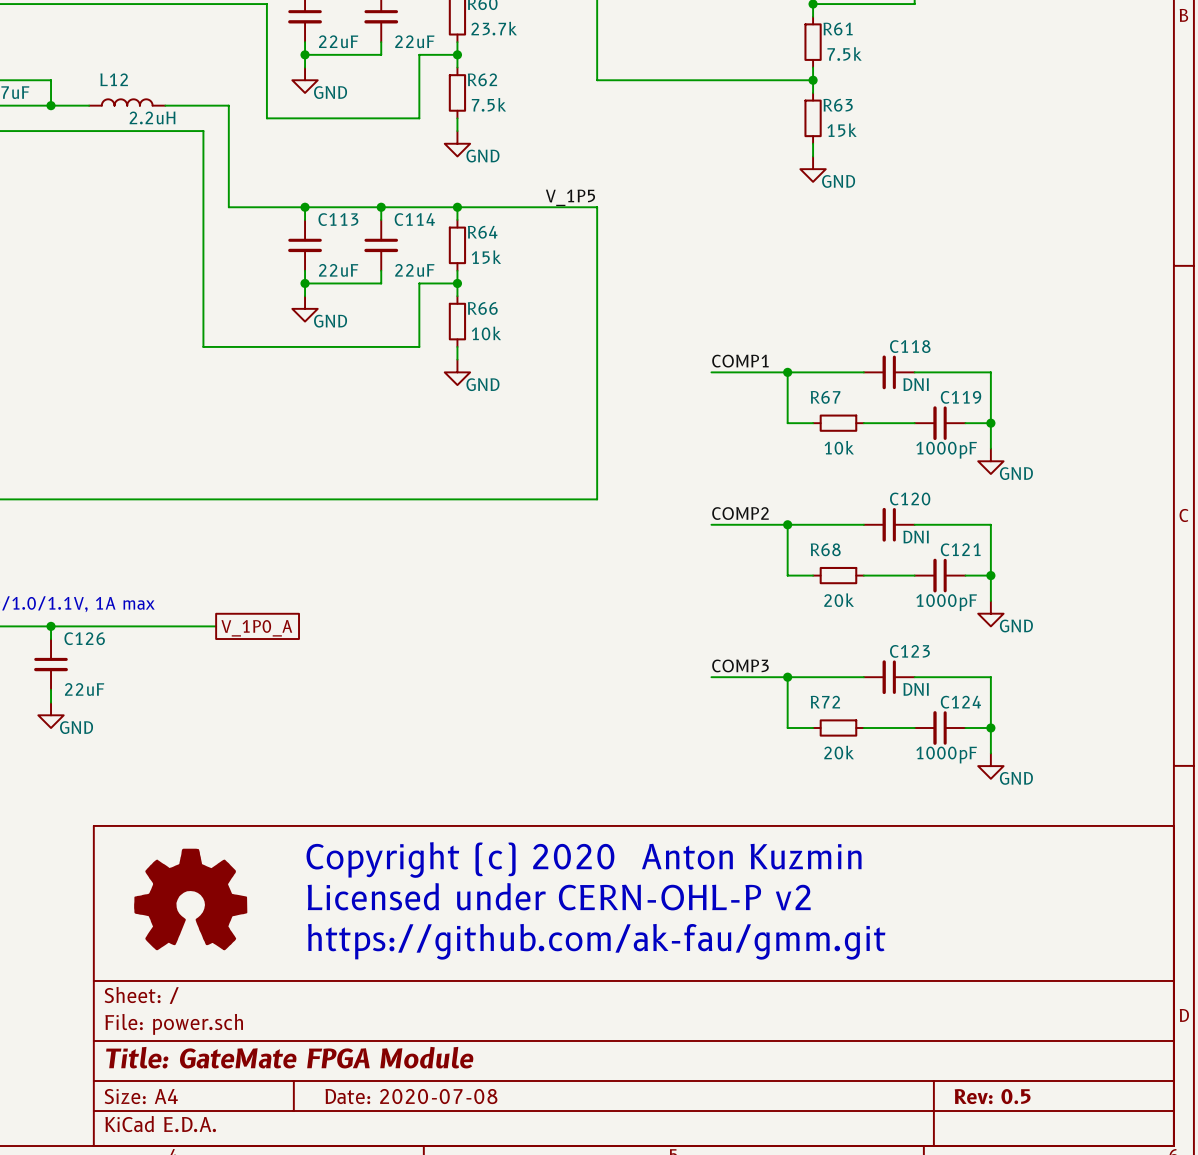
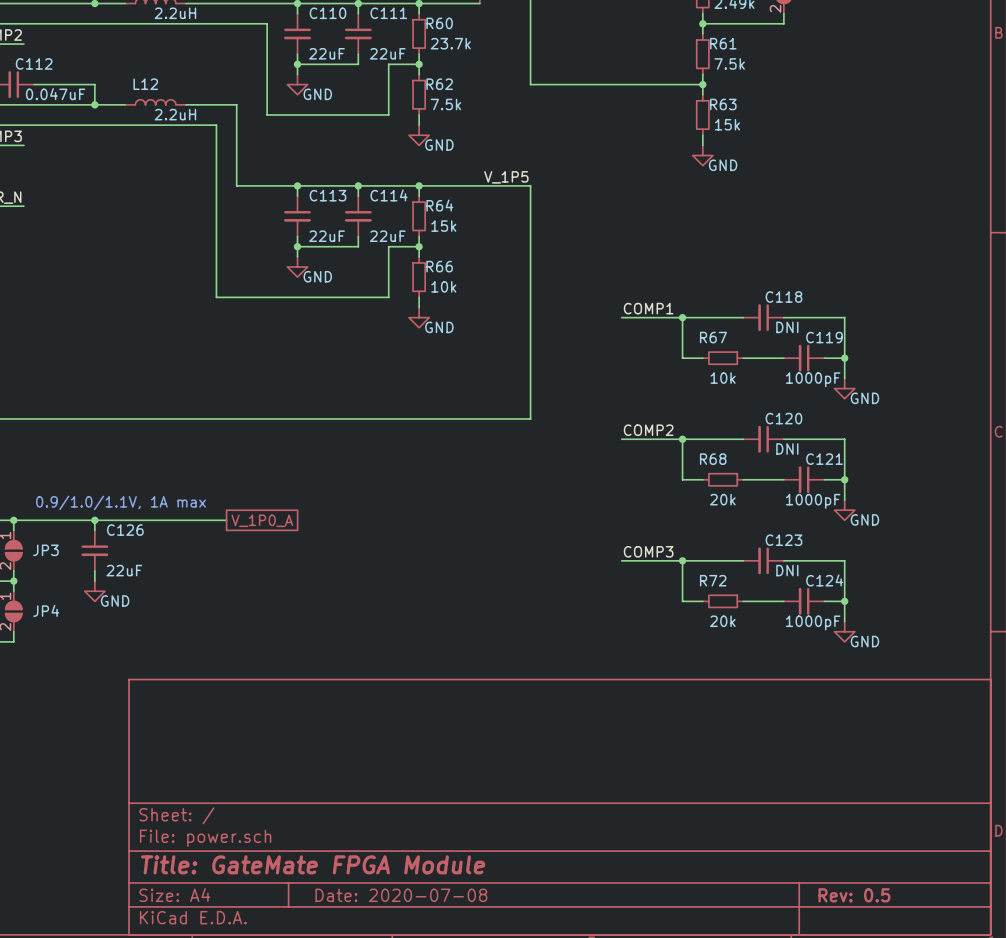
text: Copyright (c) 2020 Anton Kuzmin (584, 859) -> none
text: Licensed under CERN-OHL-P v2 (559, 896) -> none
power symbol: (190, 899) -> none
text: https://github.com/ak-fau/gmm.git (596, 941) -> none

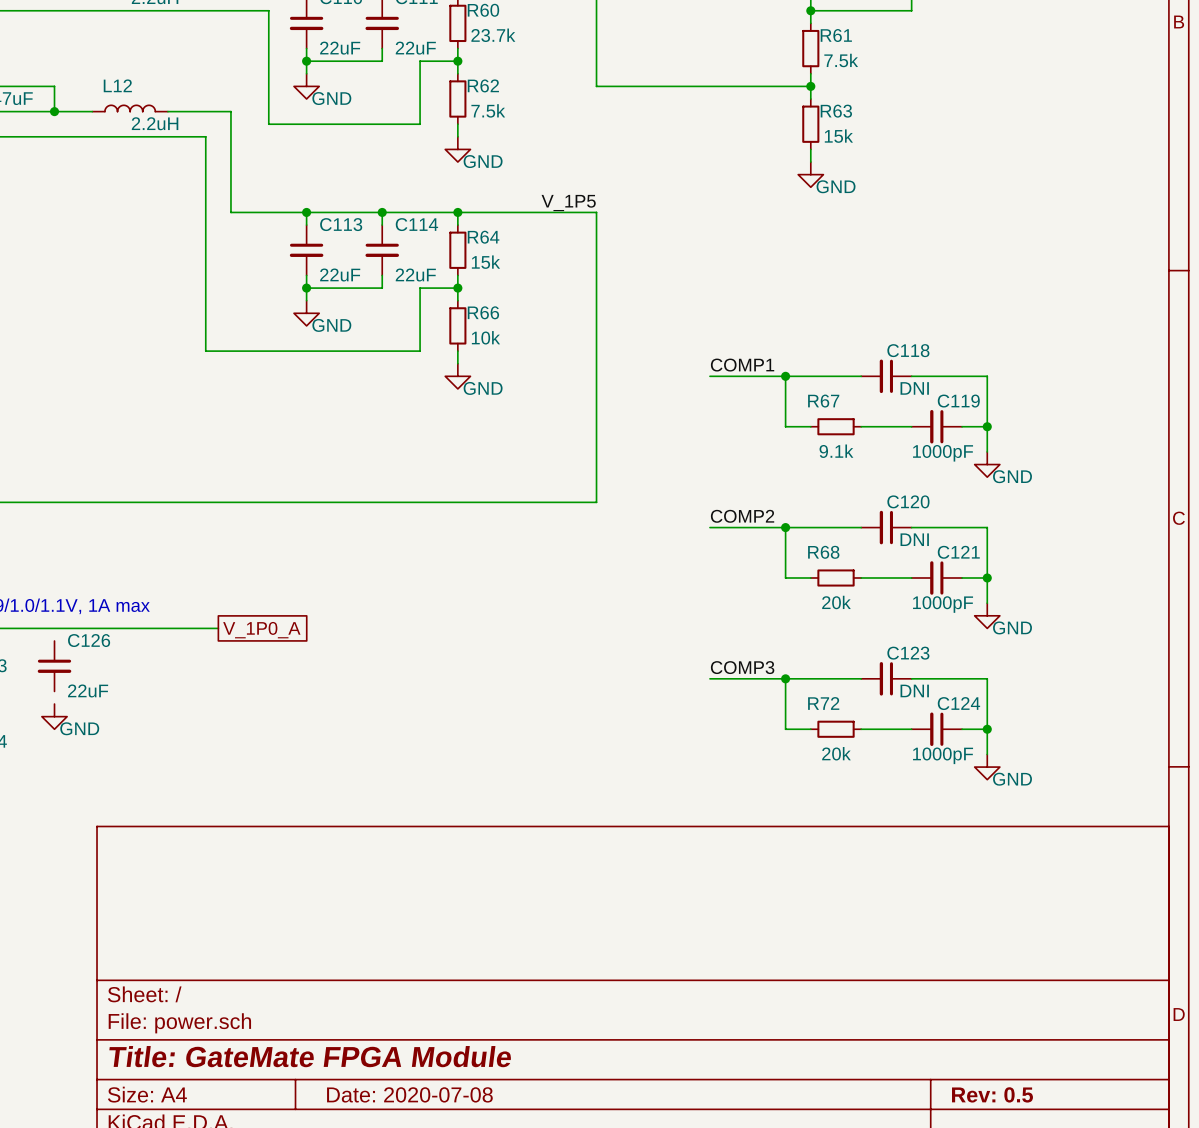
R67 value: 10k (723, 378) -> 9.1k (836, 451)
wire: (94, 520) (94, 530) -> none
junction: (94, 520) -> none
wire: (94, 570) (94, 581) -> none

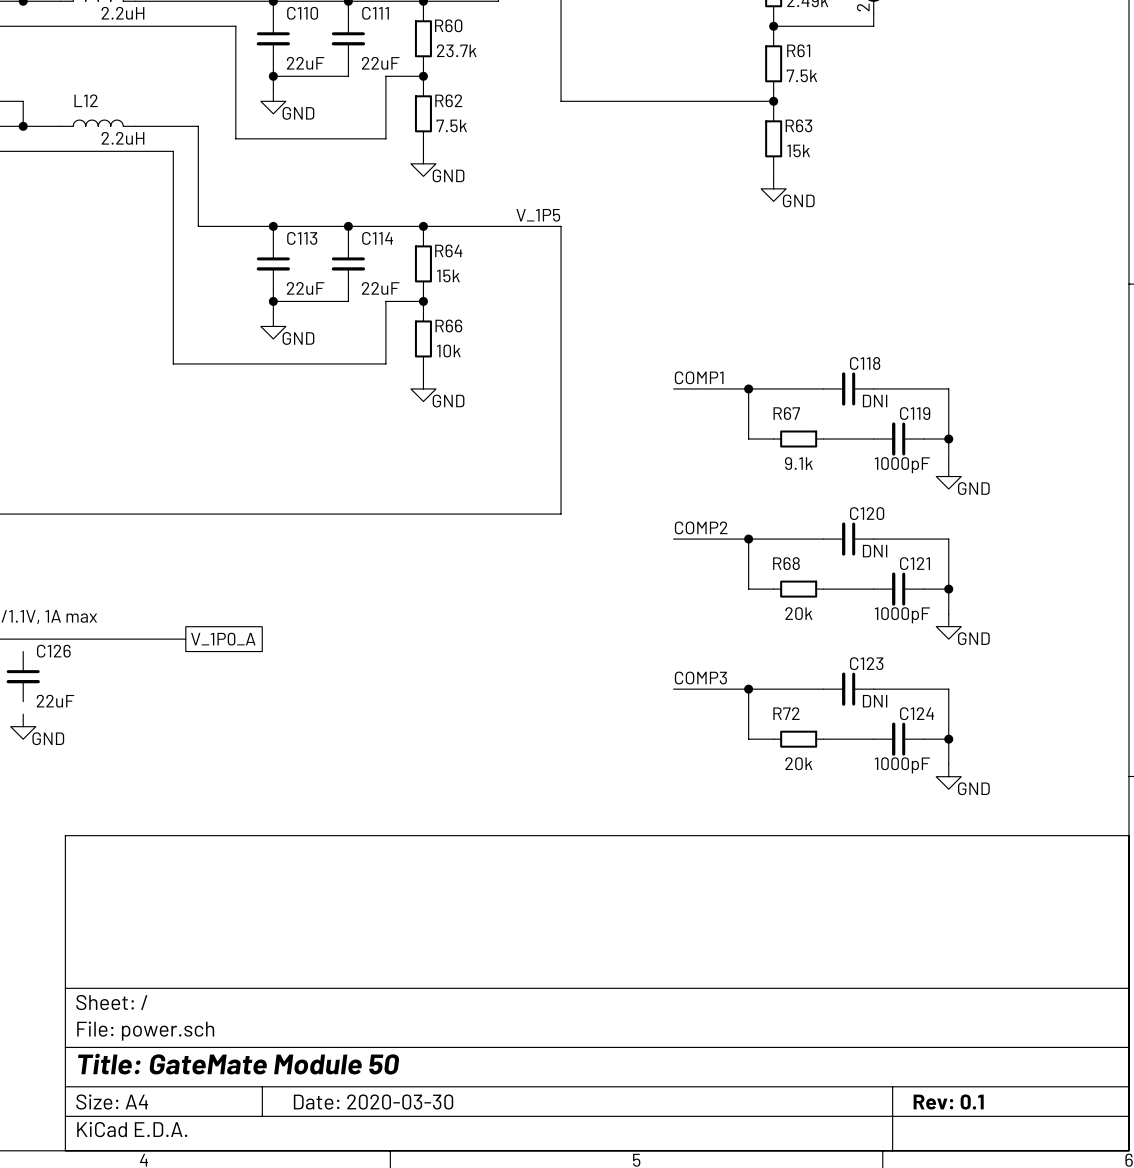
title block: Title: GateMate FPGA Module (310, 1056) -> Title: GateMate Module 50 (238, 1064)
title block: Date: 2020-07-08 (409, 1094) -> Date: 2020-03-30 (373, 1102)
title block: Rev: 0.5 (992, 1094) -> Rev: 0.1 (948, 1102)

